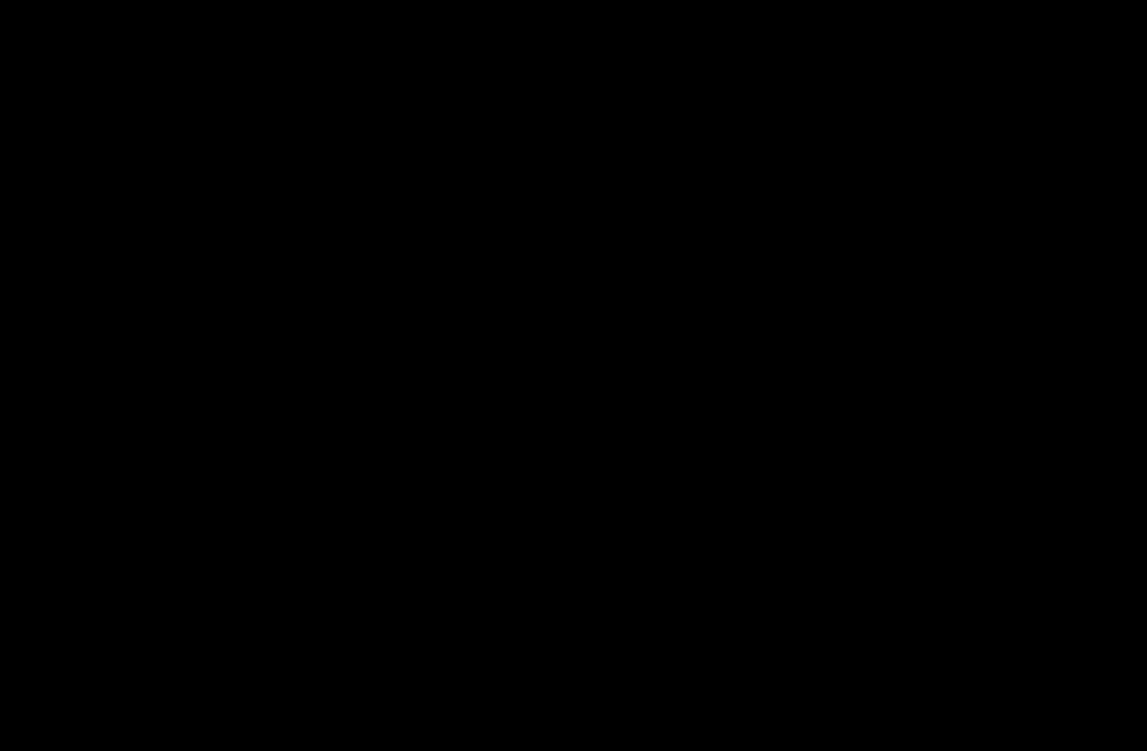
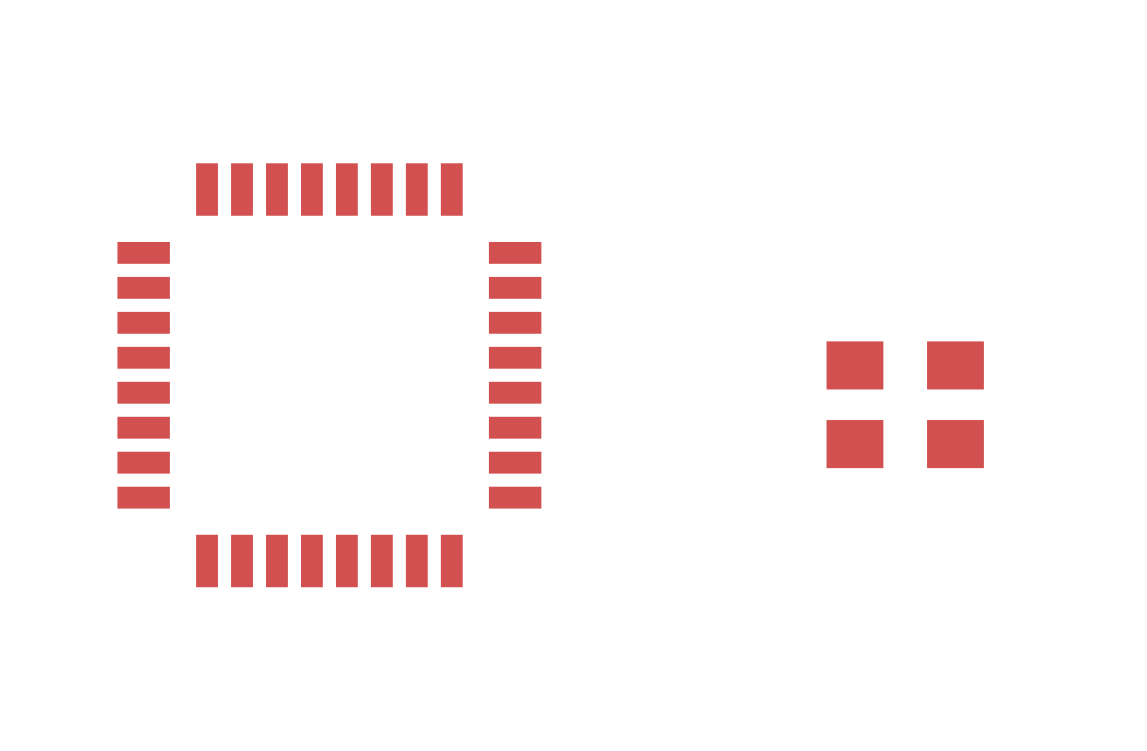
part: none -> (329, 375)
part: none -> (905, 404)

